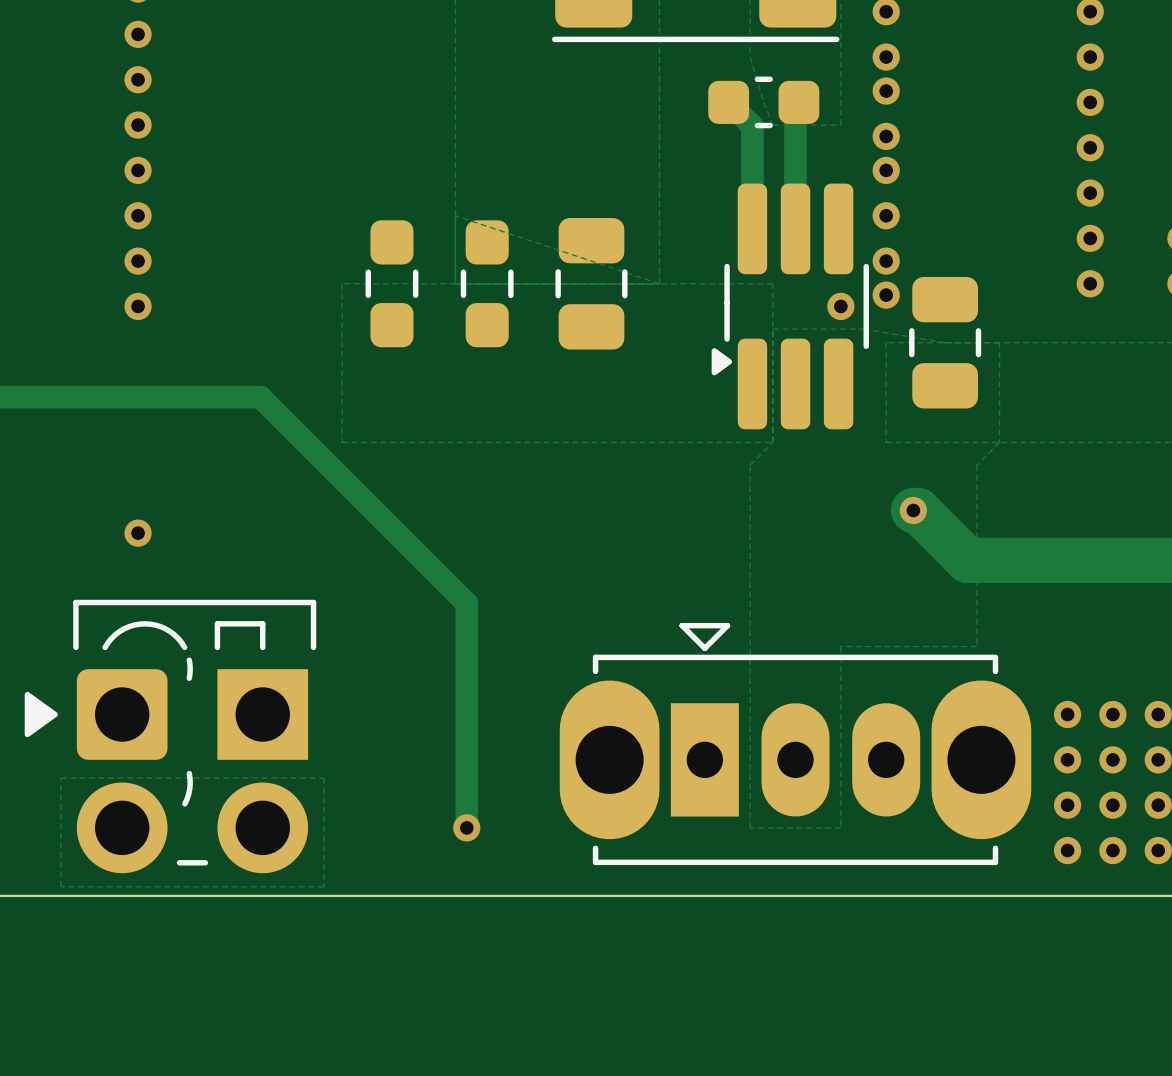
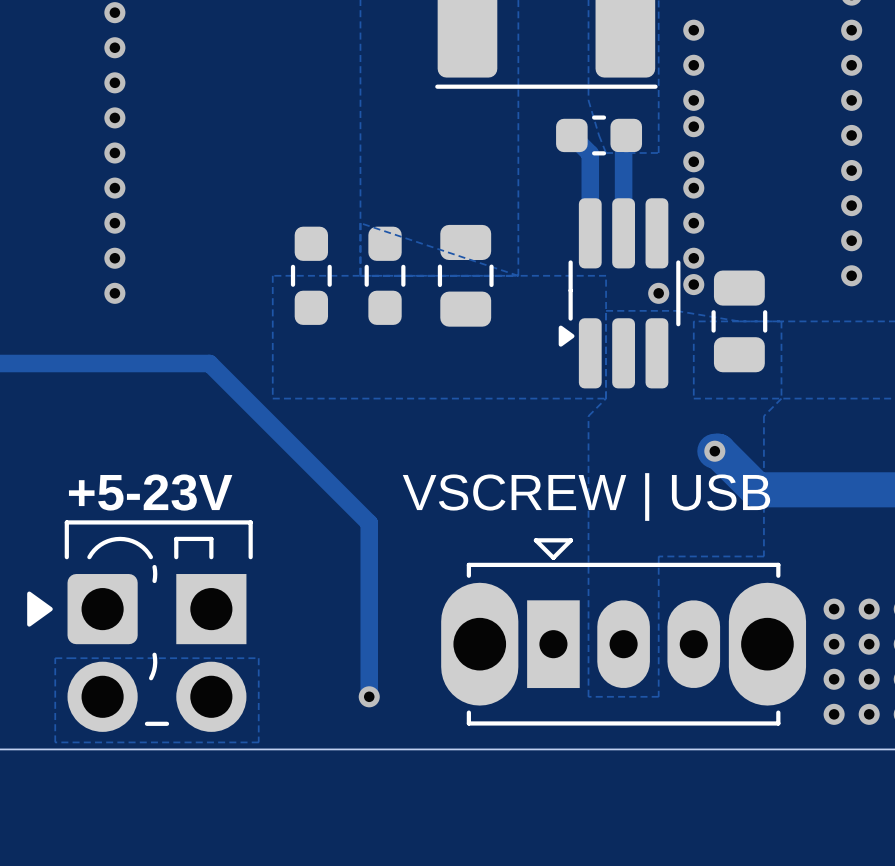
via: (138, 533) -> none
text: none -> +5-23V (150, 492)
text: none -> VSCREW | USB (586, 496)

